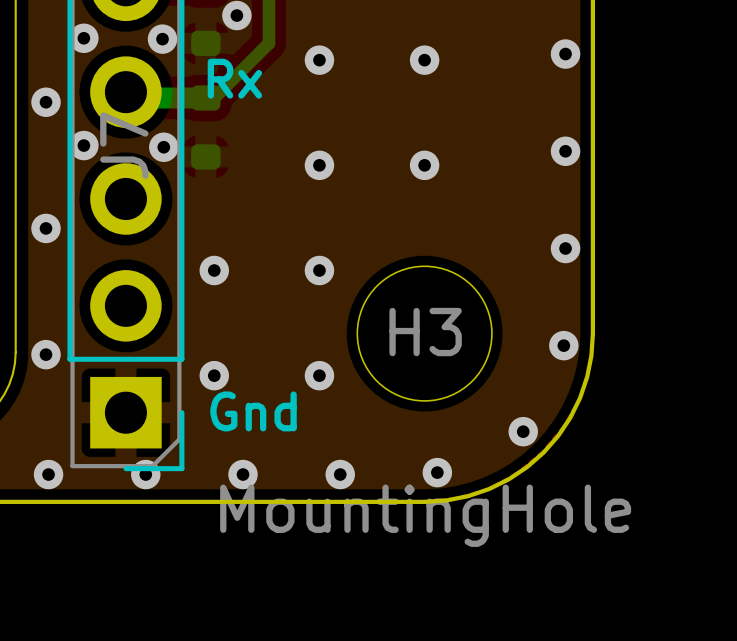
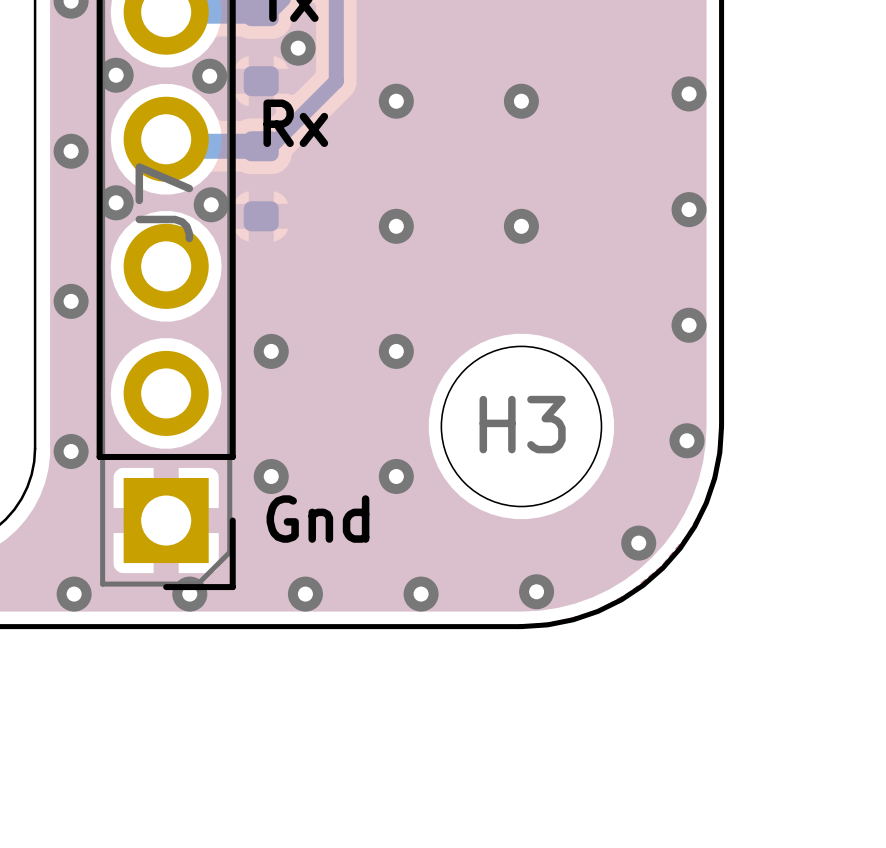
H3 value: MountingHole (425, 515) -> none

